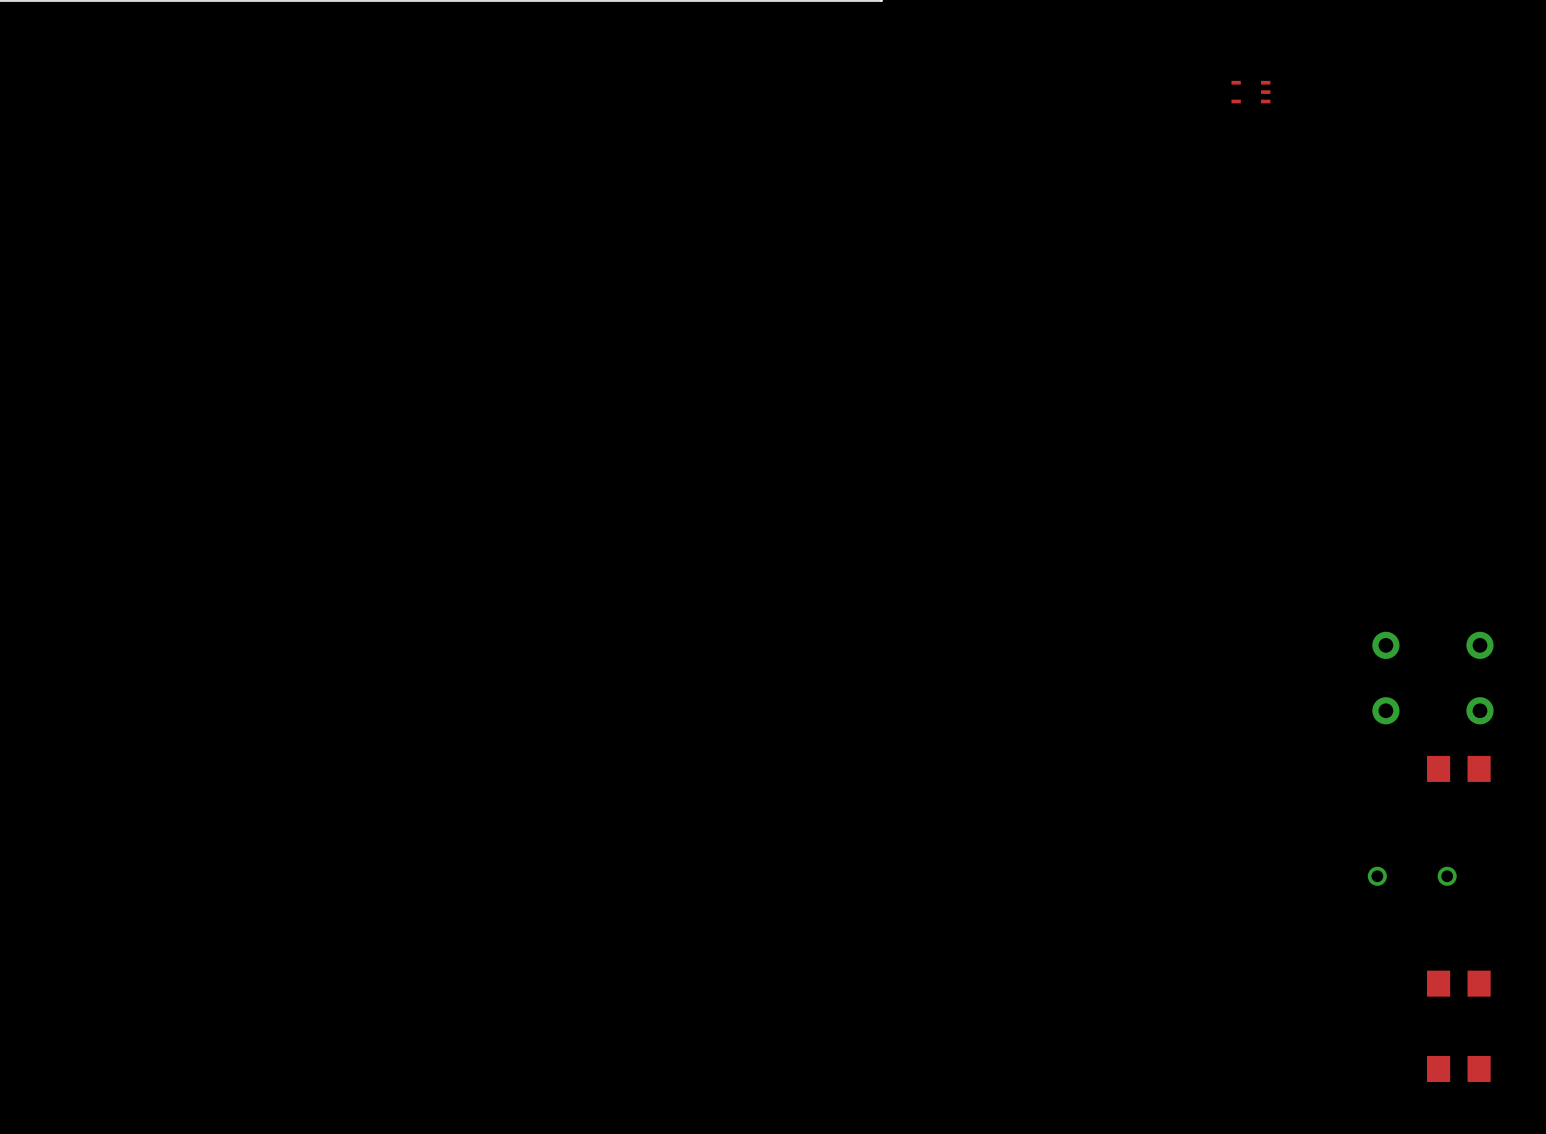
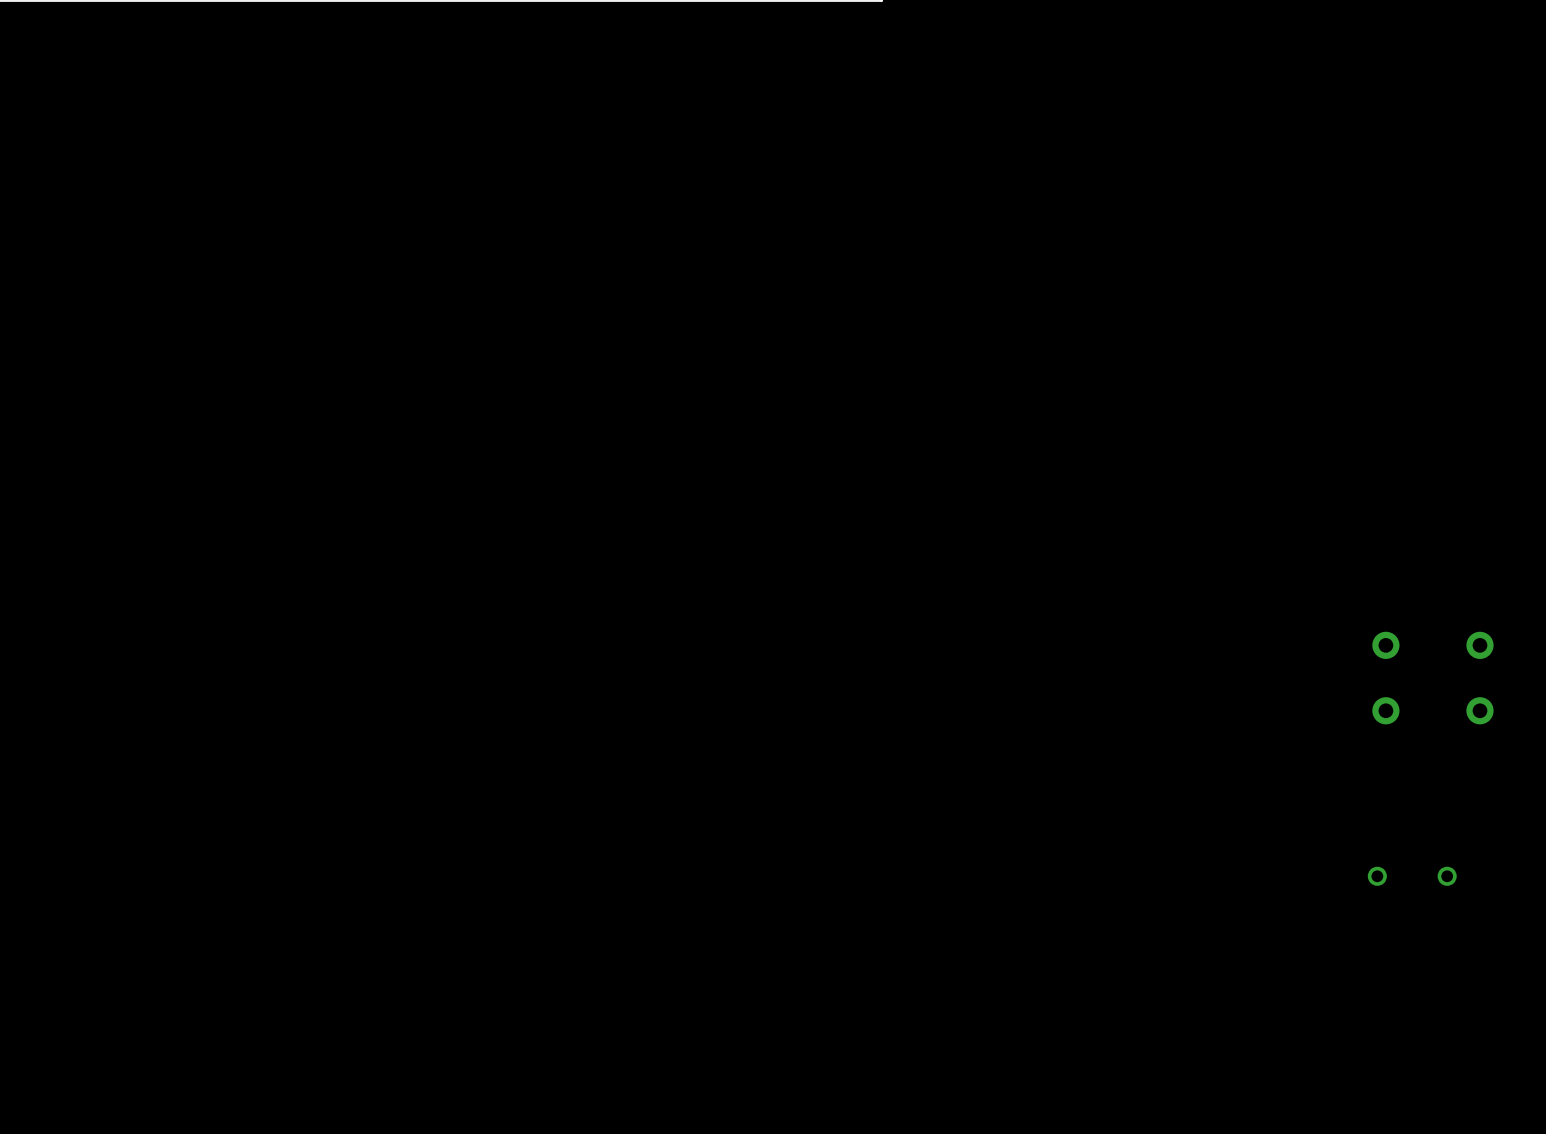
part: (1250, 92) -> none
part: (1458, 768) -> none
part: (1458, 983) -> none
part: (1458, 1068) -> none

